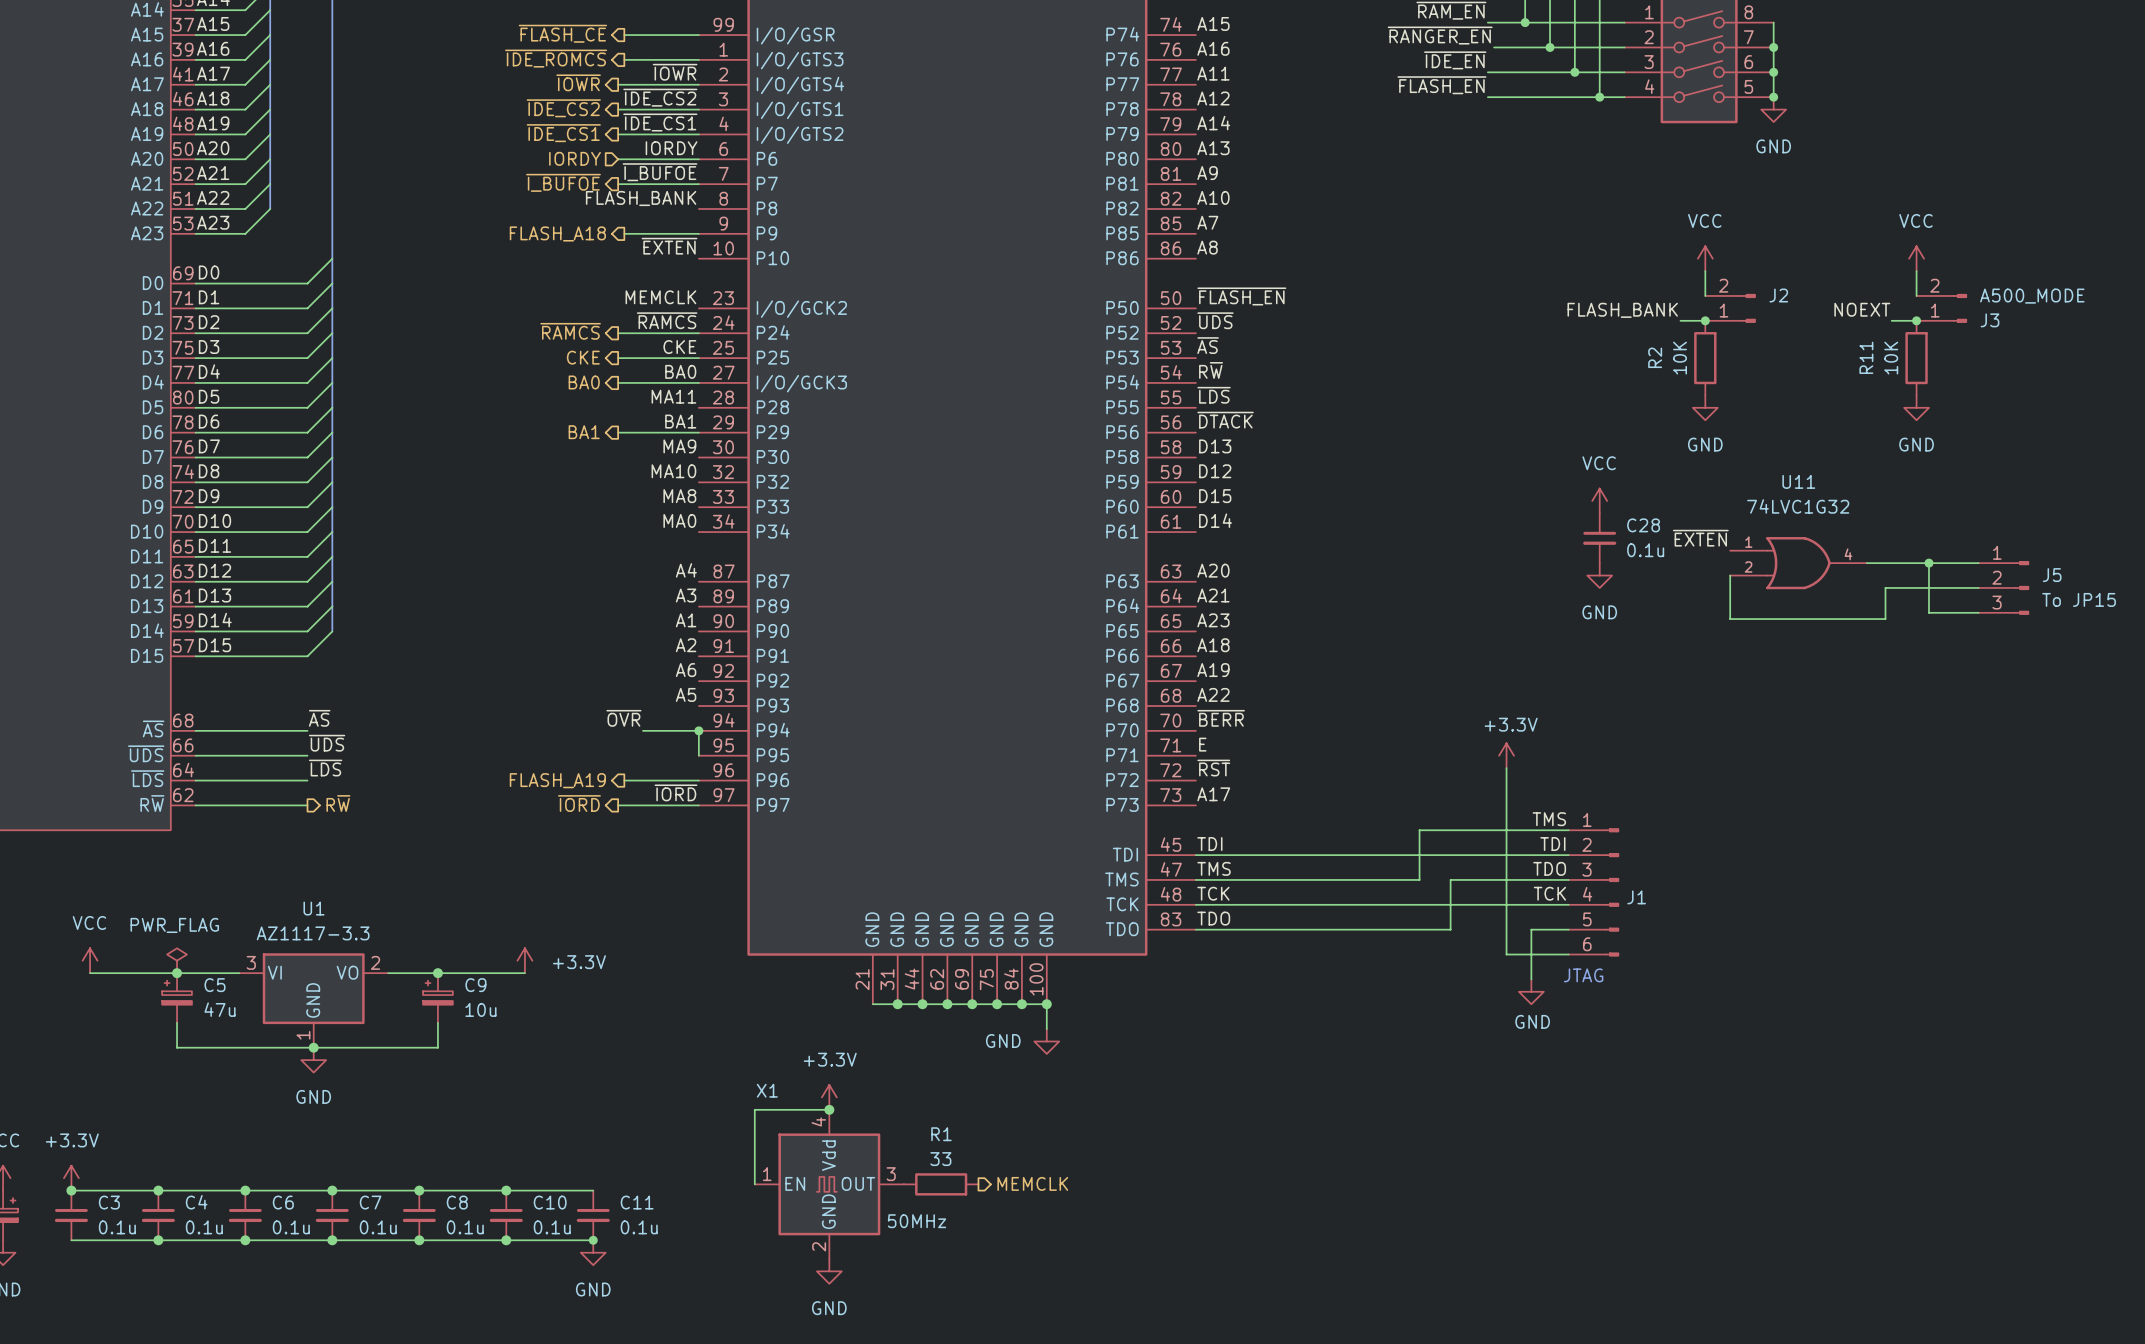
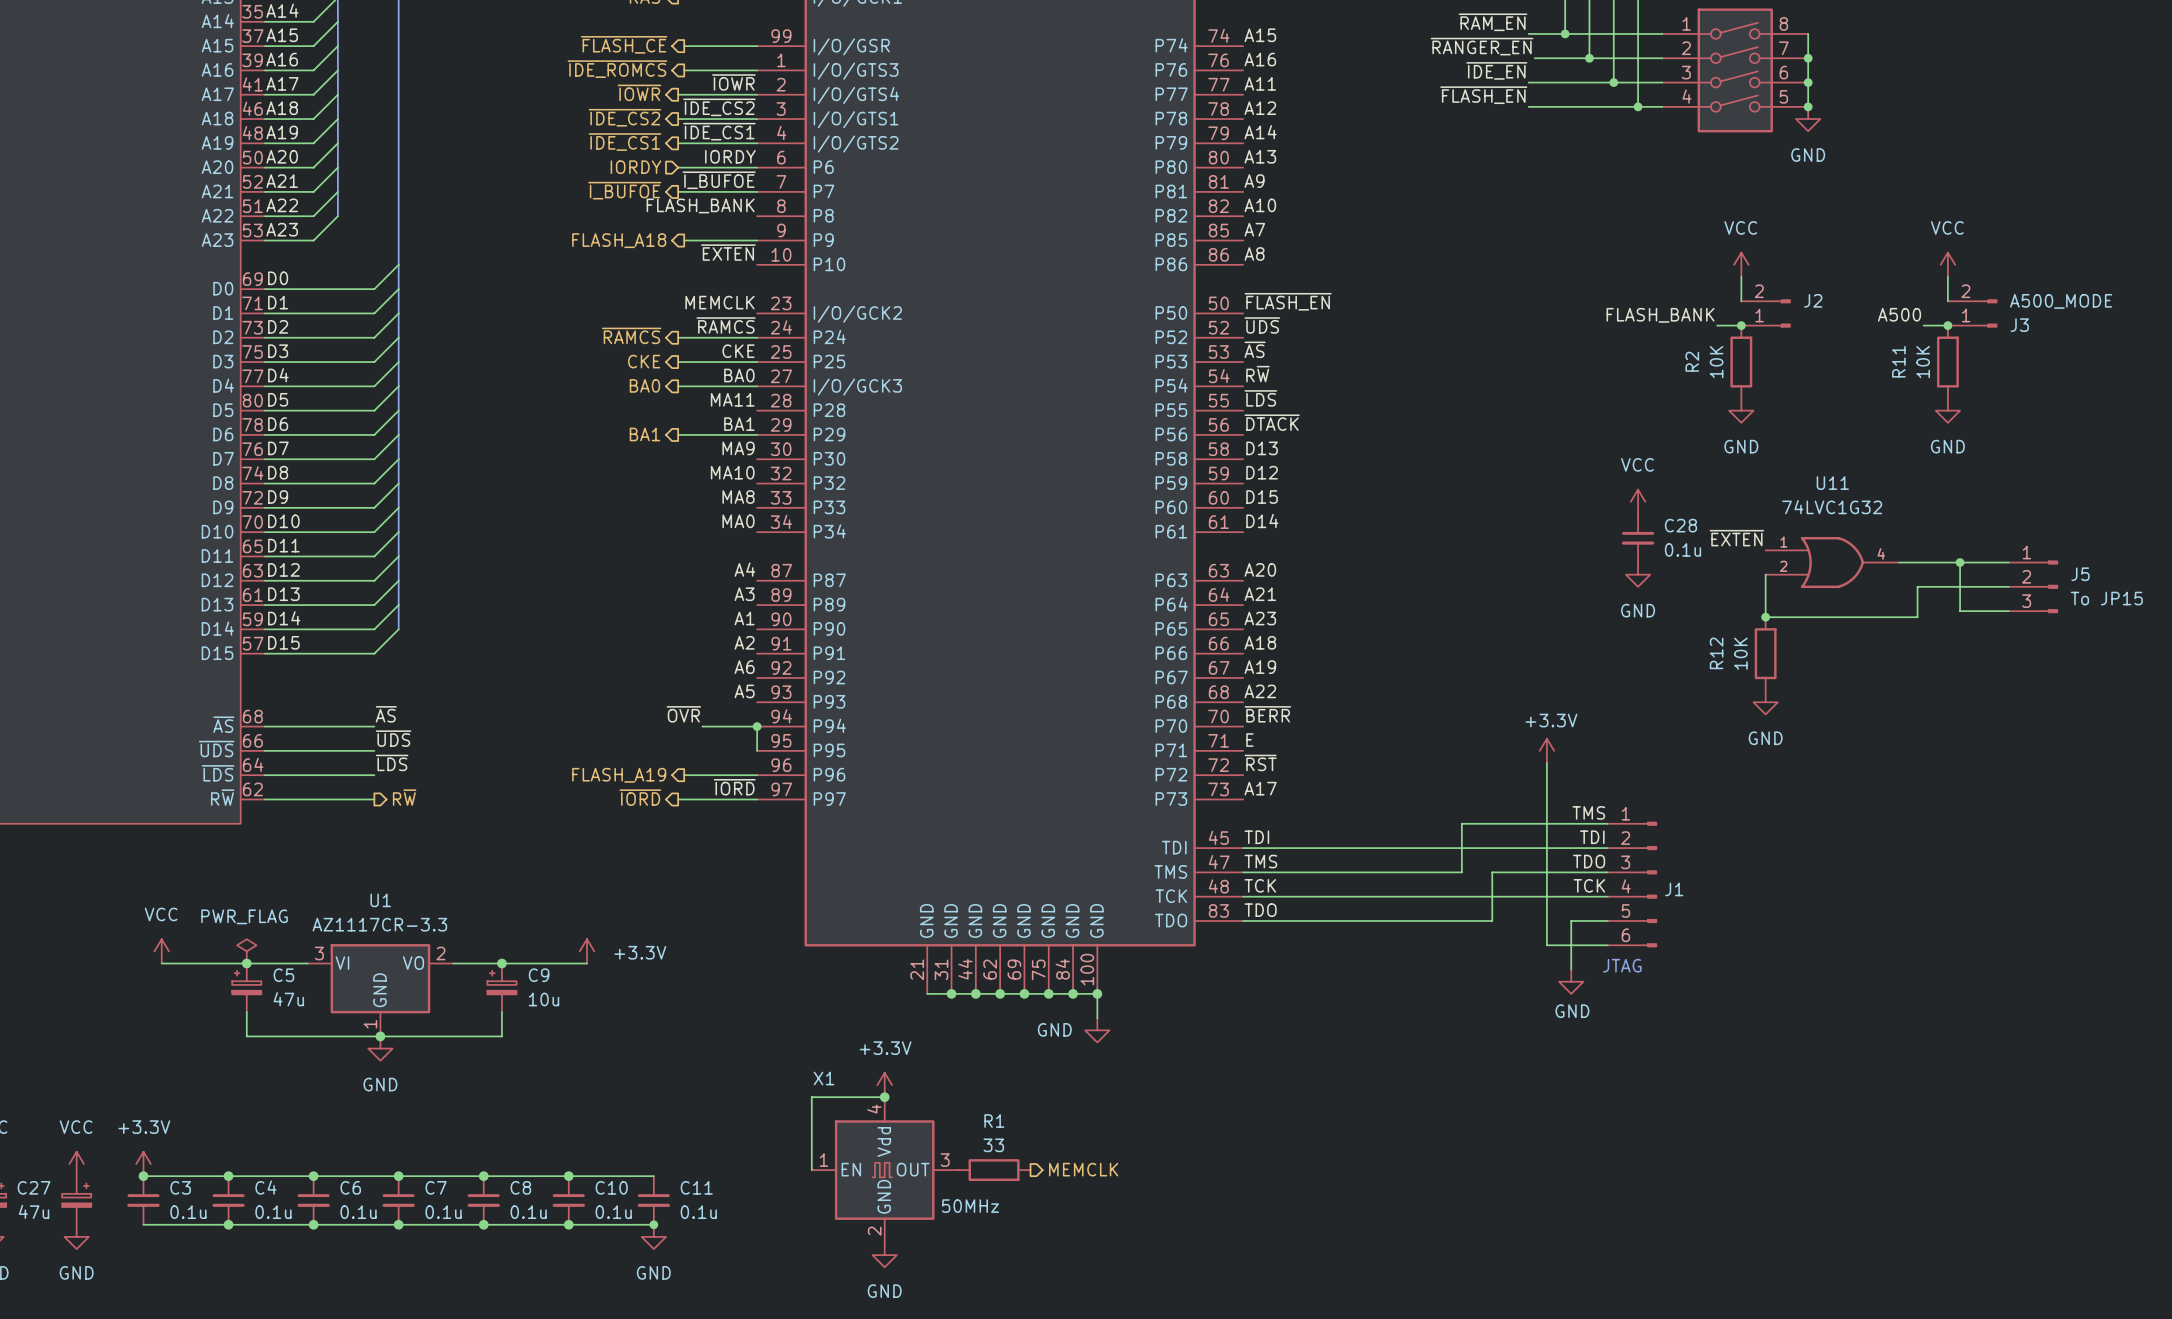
label: NOEXT (1862, 309) -> A500 (1899, 314)
junction: none -> (1765, 617)
R12: none -> 10K (1765, 653)
power symbol: none -> GND (1765, 702)
U1 value: AZ1117-3.3 (313, 933) -> AZ1117CR-3.3 (379, 924)

